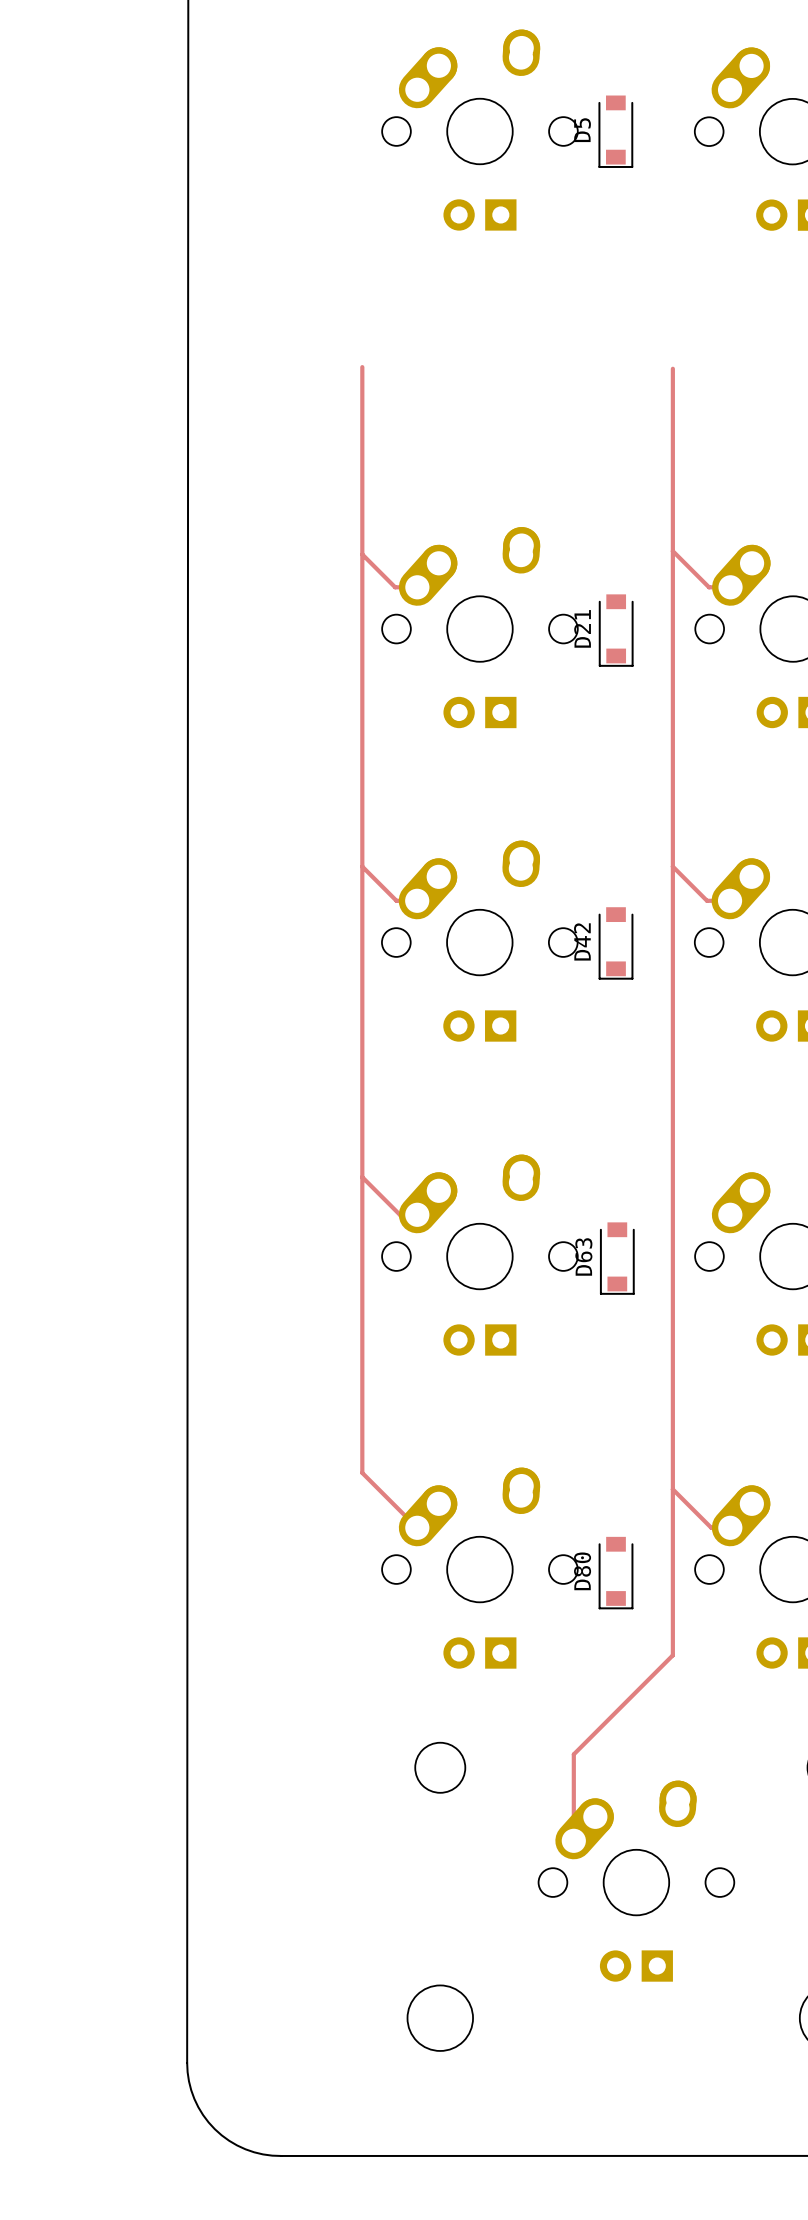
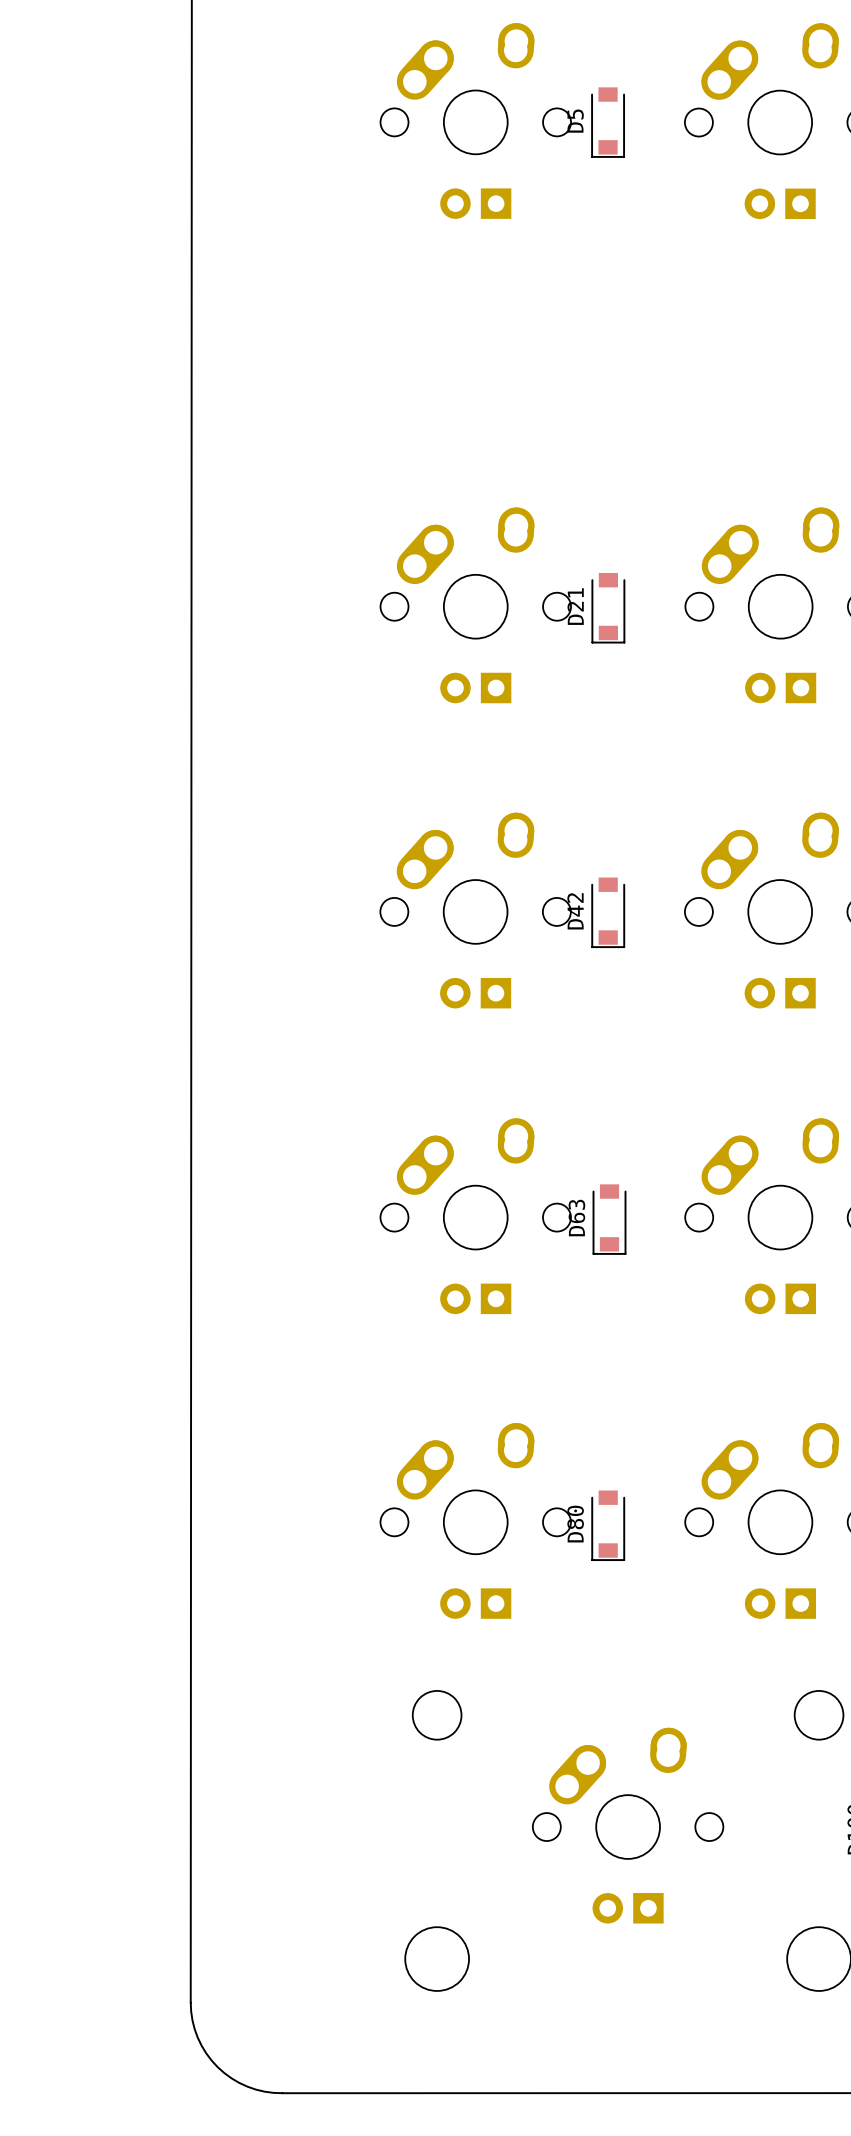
track: (362, 367) (362, 1472) (417, 1527) -> none
track: (672, 368) (672, 1655) (573, 1754) (573, 1840) -> none
track: (672, 551) (709, 587) (730, 587) -> none
track: (362, 554) (395, 587) (417, 587) -> none
track: (362, 866) (396, 900) (417, 900) -> none
track: (672, 866) (707, 900) (730, 900) -> none
track: (362, 1177) (399, 1214) (417, 1214) -> none
track: (672, 1489) (711, 1527) (730, 1527) -> none

